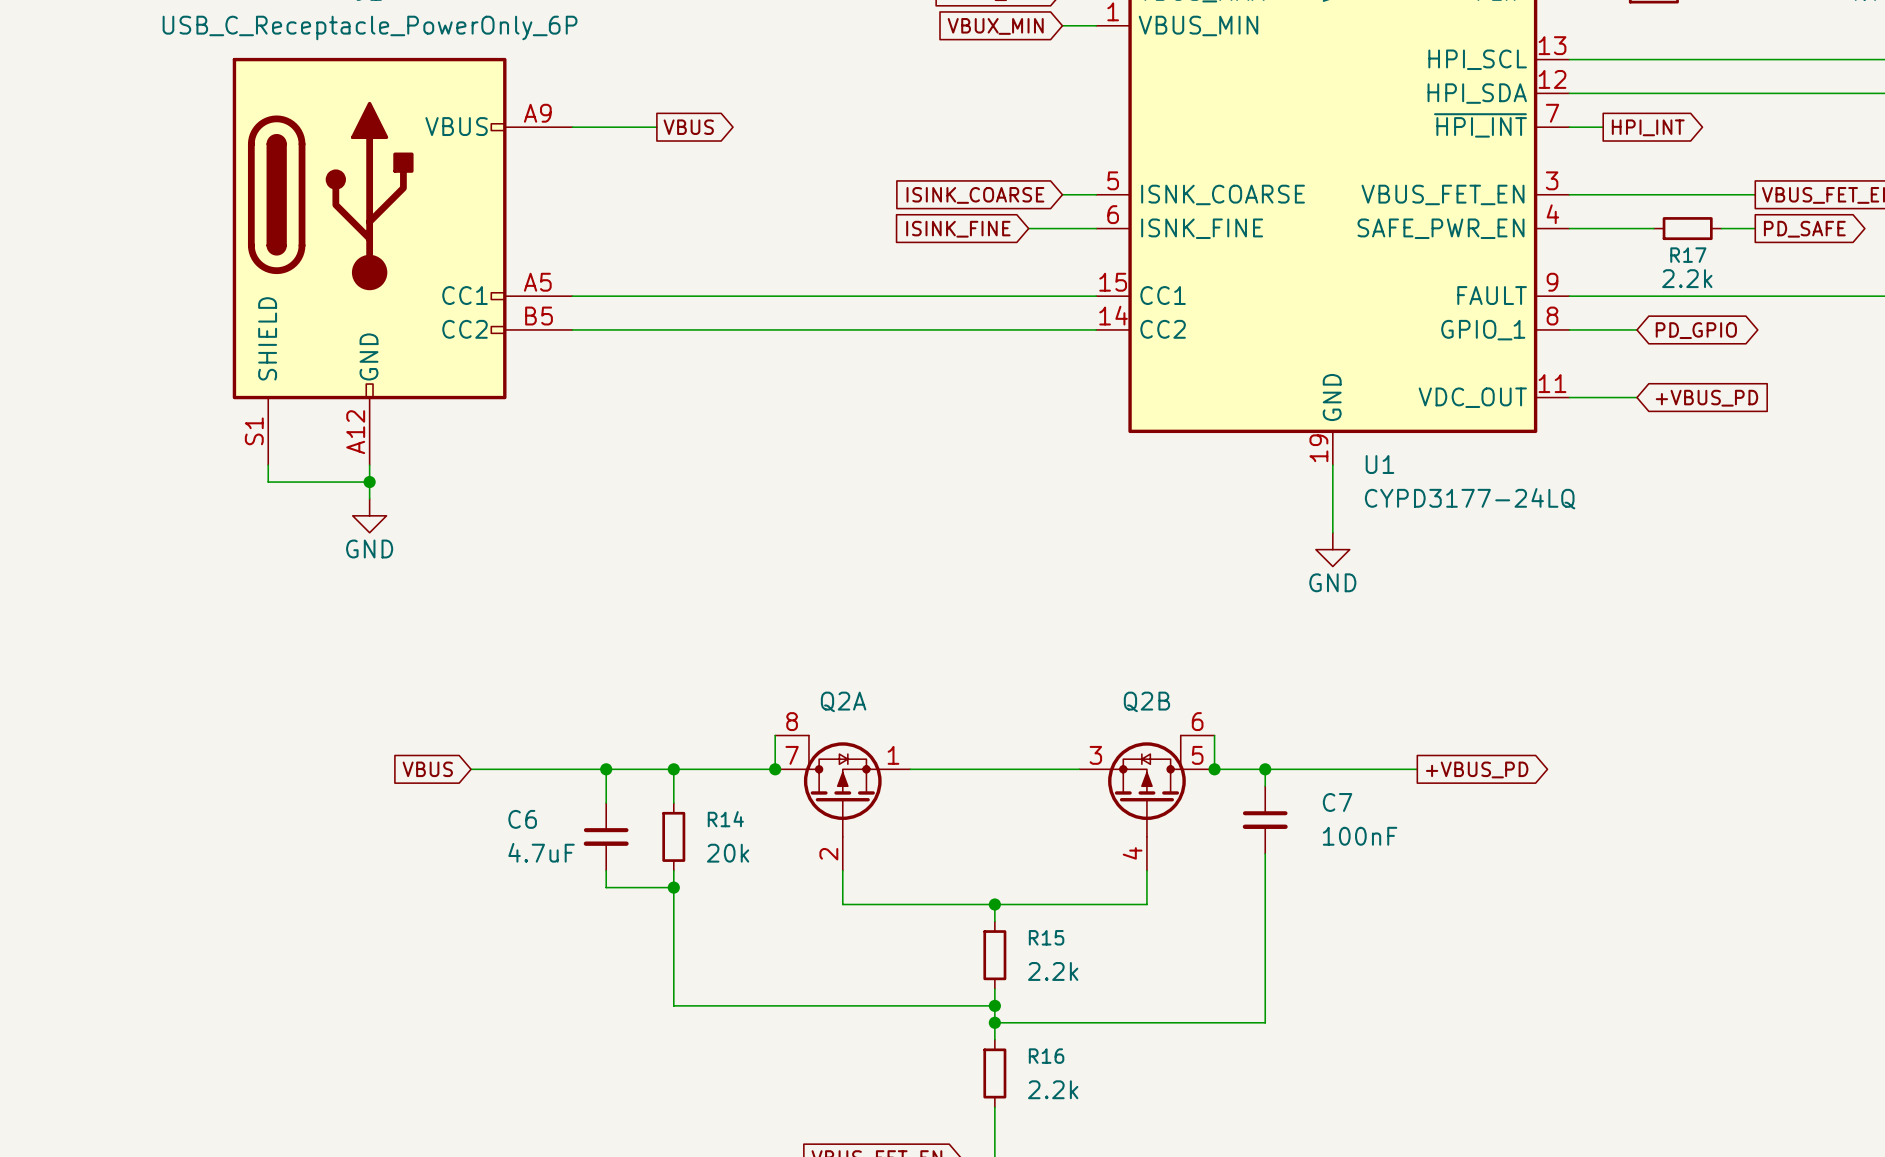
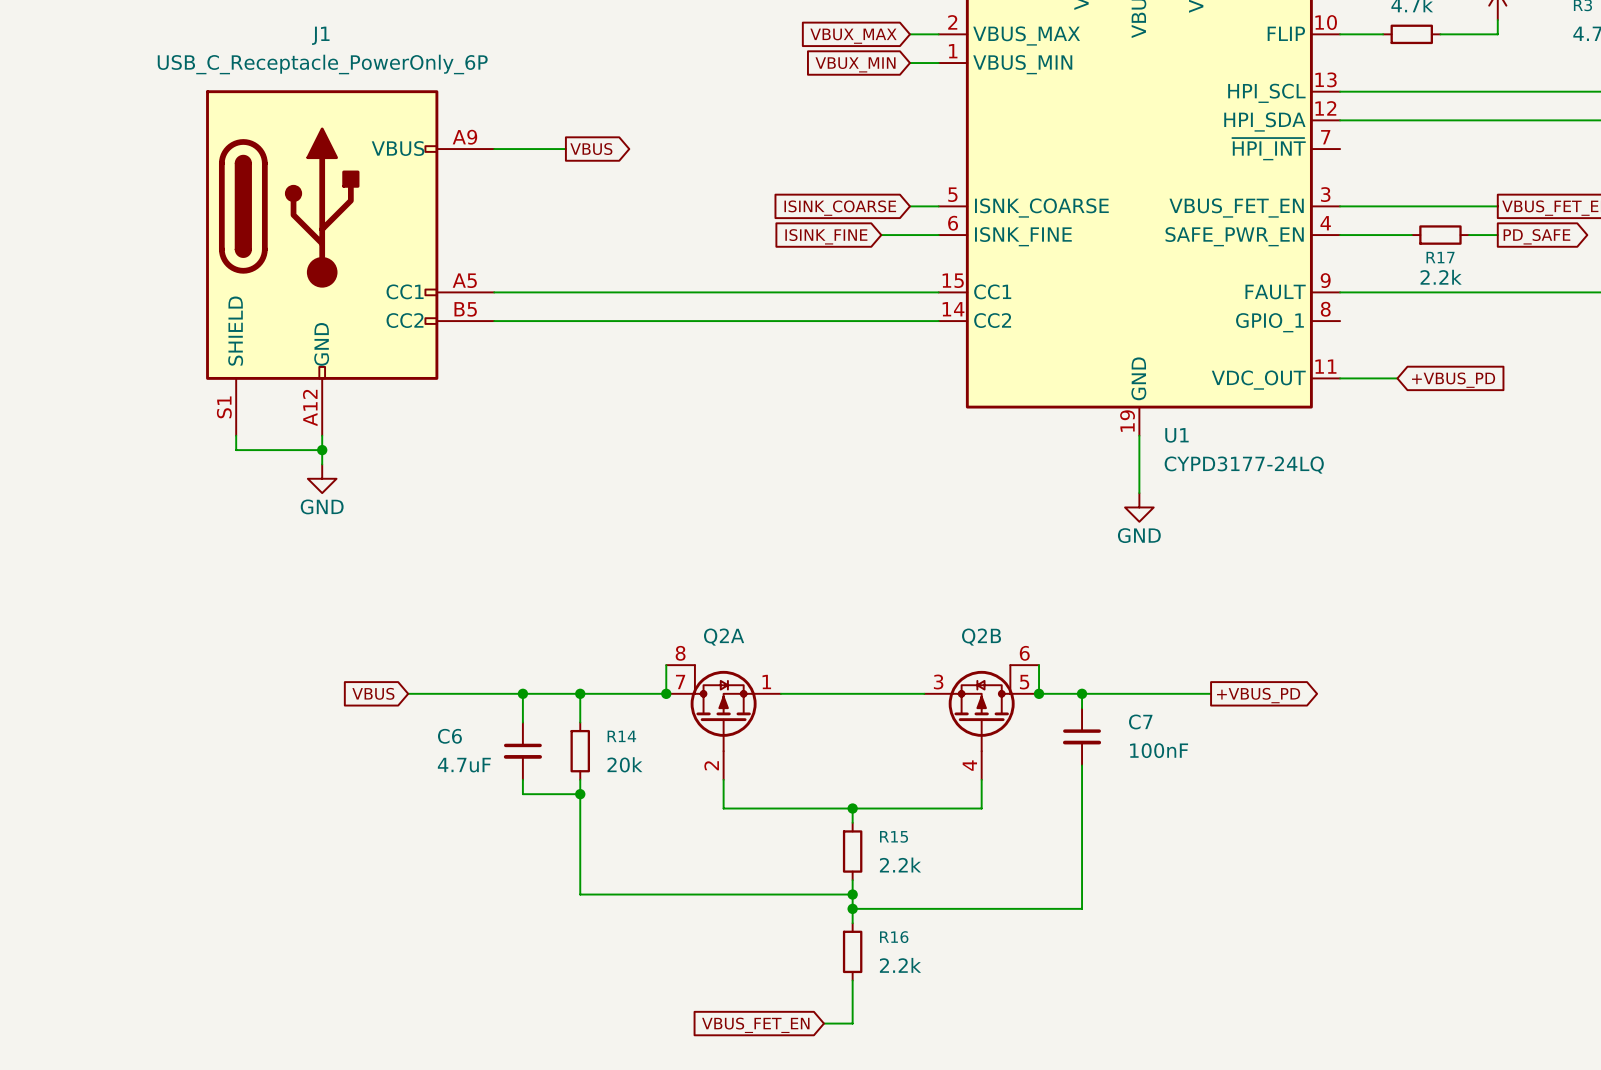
wire: (1569, 127) (1603, 127) -> none
global label: HPI_INT (1648, 127) -> none
wire: (1569, 329) (1636, 329) -> none
global label: PD_GPIO (1696, 330) -> none

